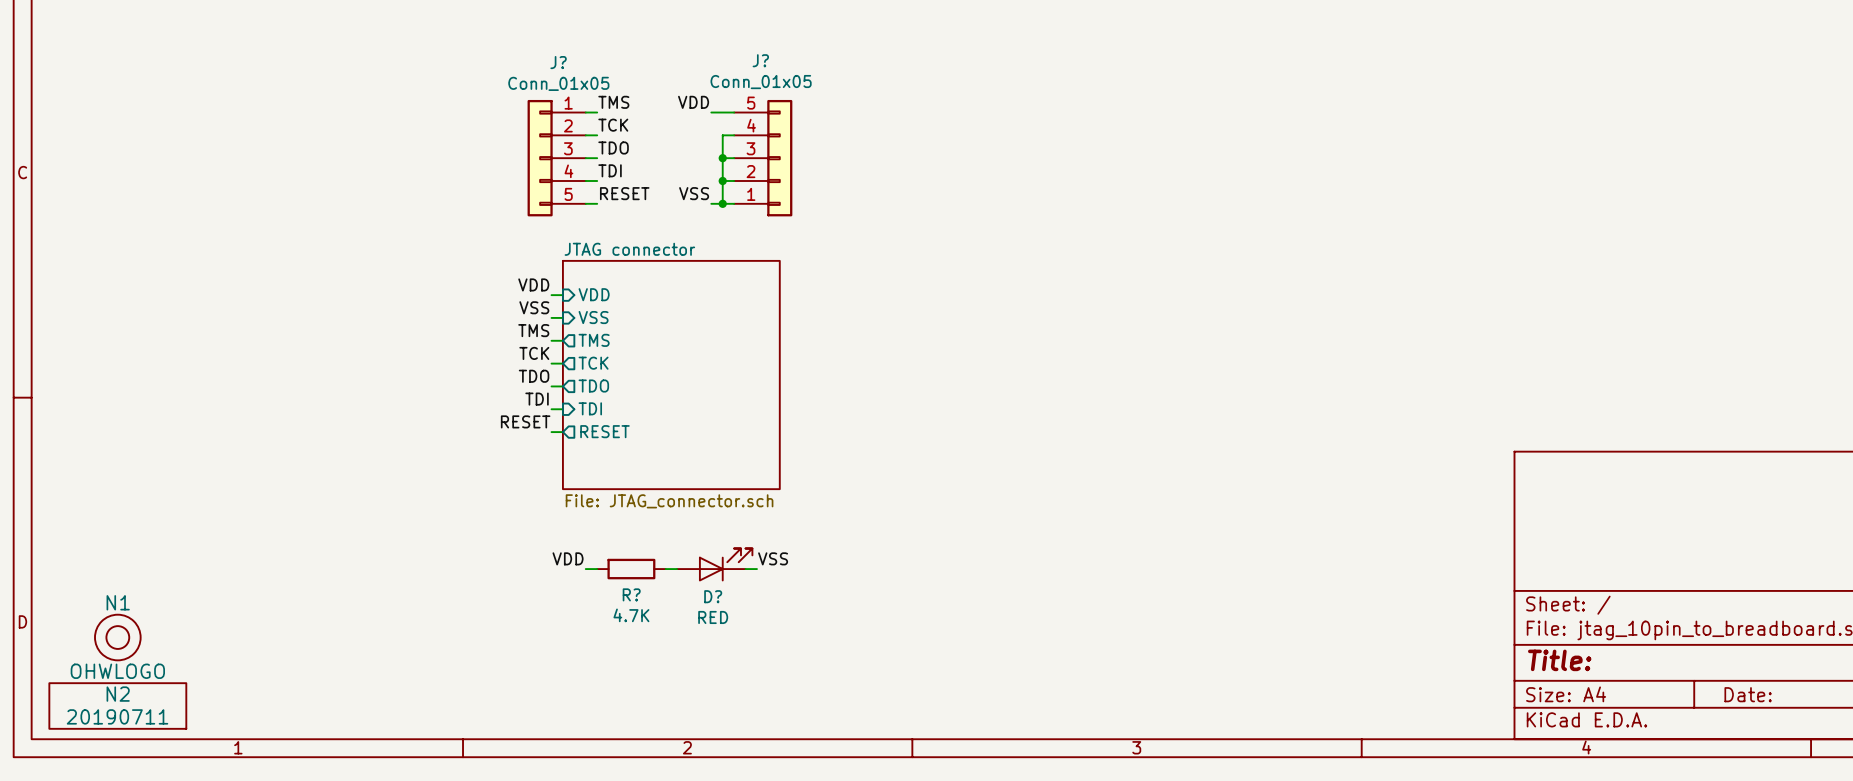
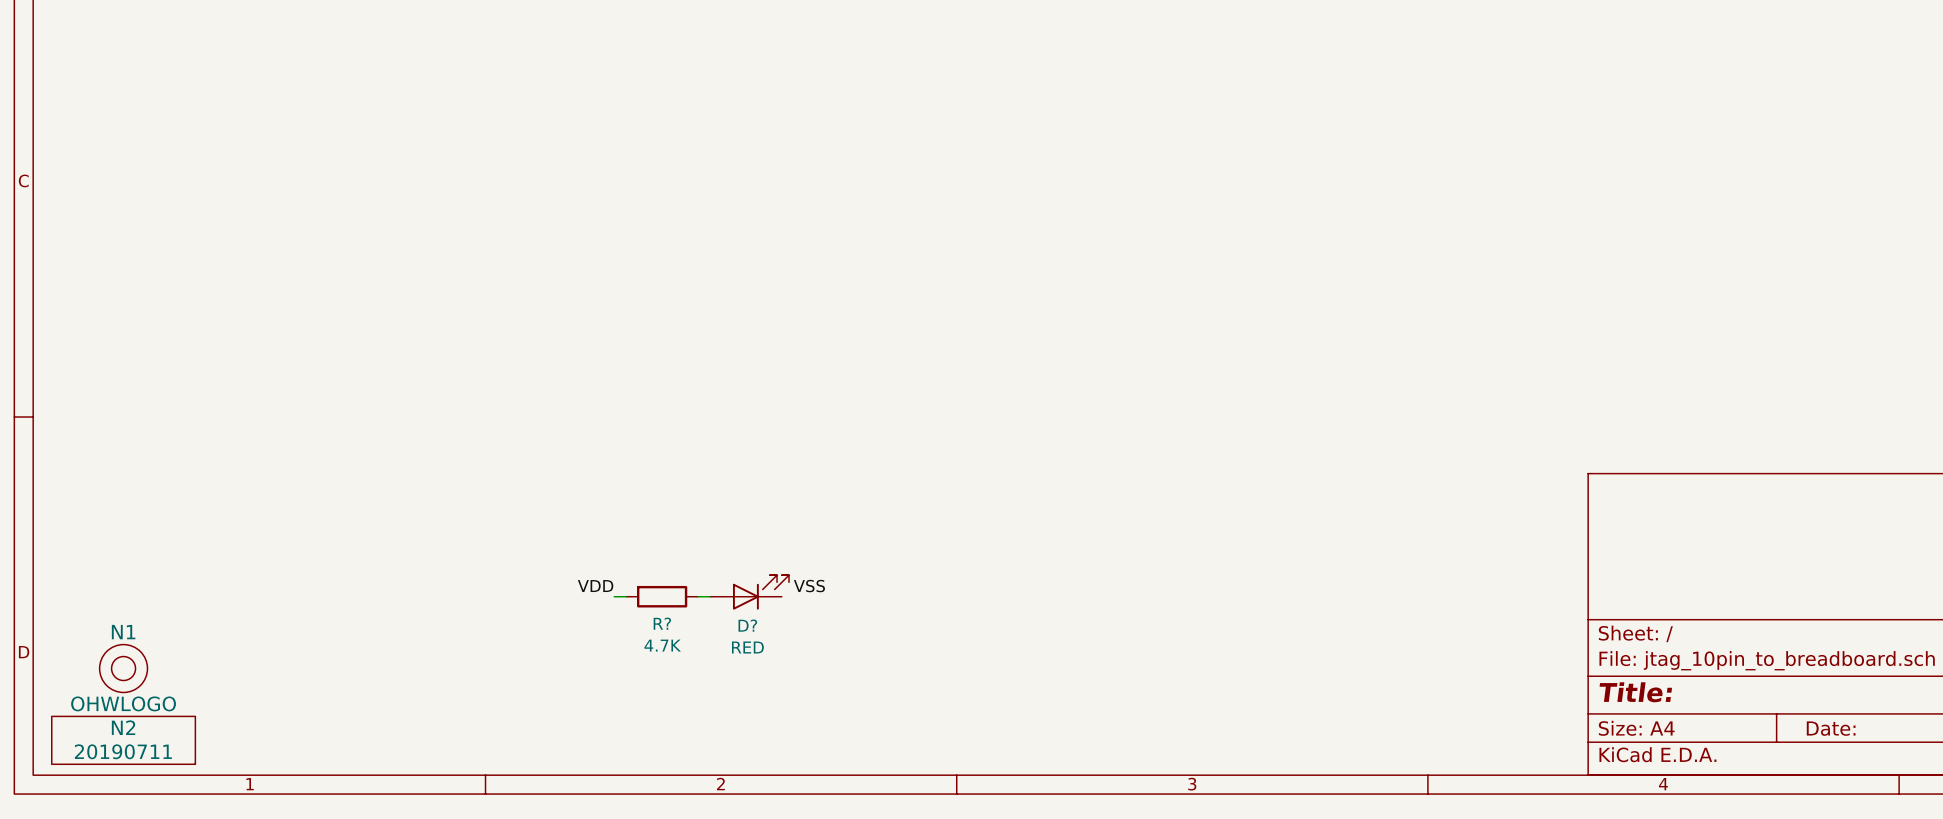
label: TMS (613, 102) -> none
label: VDD (693, 102) -> none
wire: (585, 112) (597, 112) -> none
wire: (711, 112) (734, 112) -> none
label: TCK (613, 125) -> none
wire: (585, 135) (597, 135) -> none
wire: (734, 135) (722, 135) (722, 203) -> none
label: TDO (613, 147) -> none
J?: Conn_01x05 (556, 158) -> none
wire: (585, 158) (597, 158) -> none
wire: (722, 158) (734, 158) -> none
junction: (722, 158) -> none
J?: Conn_01x05 (763, 158) -> none
label: TDI (610, 170) -> none
wire: (585, 181) (597, 181) -> none
wire: (722, 181) (734, 181) -> none
junction: (722, 181) -> none
label: RESET (624, 193) -> none
label: VSS (694, 193) -> none
wire: (585, 203) (597, 203) -> none
wire: (711, 203) (734, 203) -> none
junction: (722, 203) -> none
label: VDD (533, 284) -> none
sheet pin: VDD (594, 294) -> none
wire: (551, 295) (562, 295) -> none
label: VSS (534, 307) -> none
wire: (551, 317) (562, 317) -> none
sheet pin: VSS (593, 317) -> none
label: TMS (533, 330) -> none
wire: (551, 340) (562, 340) -> none
sheet pin: TMS (594, 340) -> none
label: TCK (534, 353) -> none
wire: (551, 363) (562, 363) -> none
sheet pin: TCK (593, 363) -> none
sheet JTAG connector: File: JTAG_connector.sch (671, 375) -> none
label: TDO (534, 376) -> none
wire: (551, 386) (562, 386) -> none
sheet pin: TDO (593, 386) -> none
label: TDI (537, 399) -> none
sheet pin: TDI (590, 408) -> none
wire: (551, 409) (562, 409) -> none
label: RESET (525, 421) -> none
sheet pin: RESET (604, 431) -> none
wire: (551, 432) (562, 432) -> none
wire: (745, 569) (756, 569) -> none

